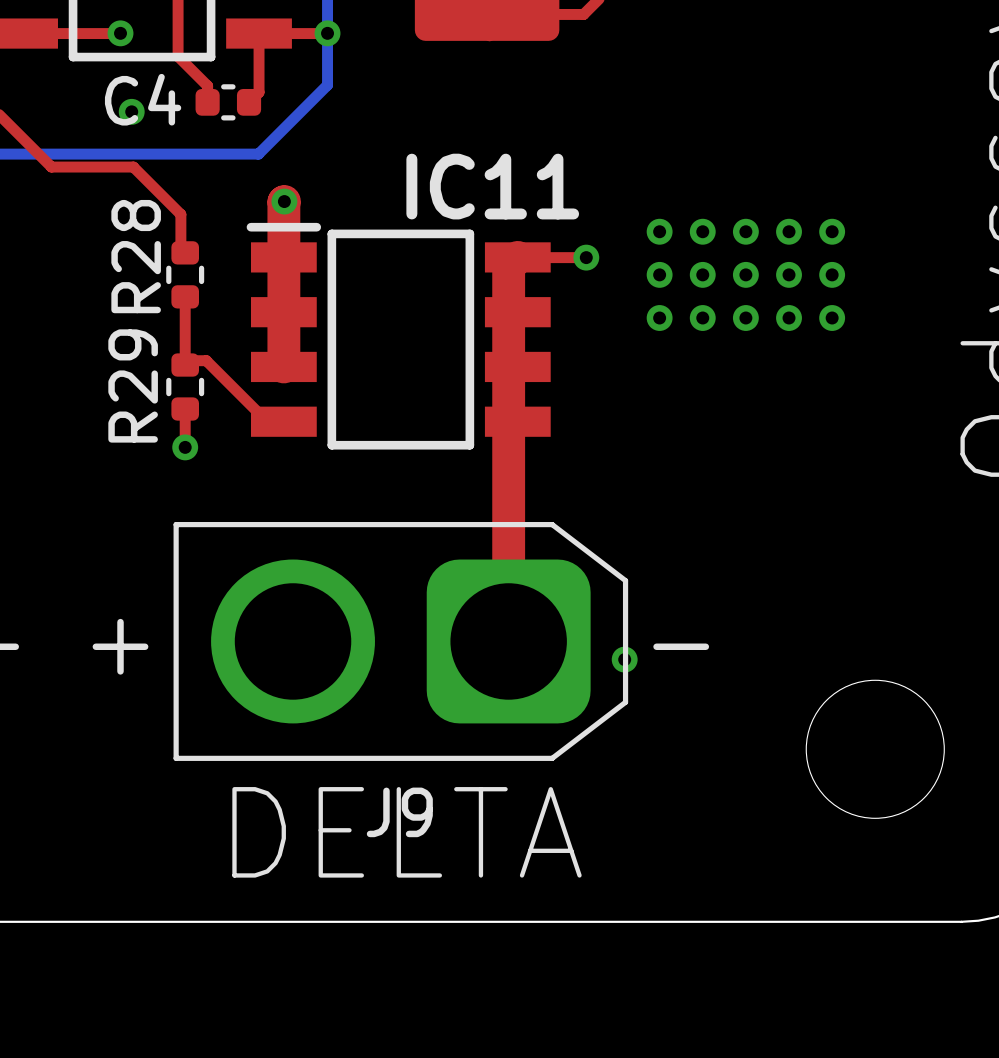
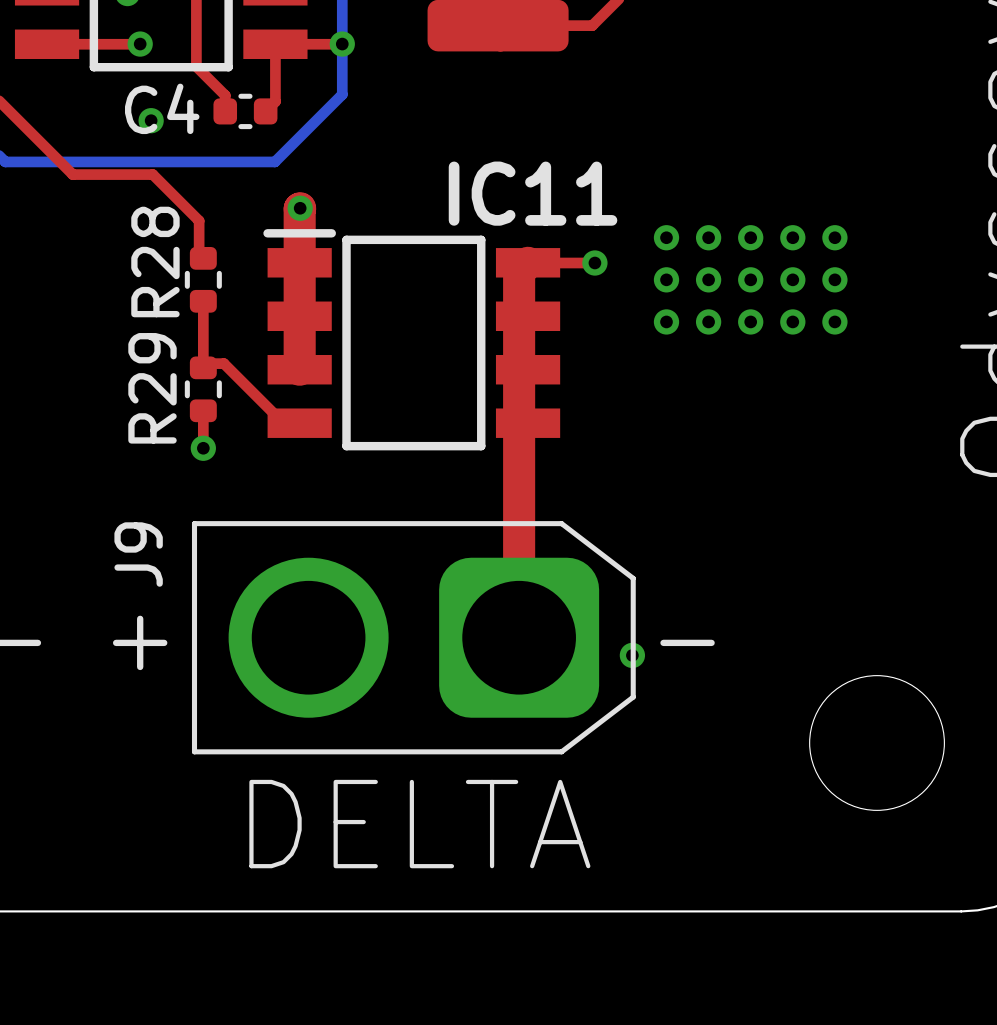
IC11 name position: IC11 (492, 186) -> IC11 (533, 193)
J9 name rotation: 0° (399, 812) -> 90° counterclockwise (138, 554)
J9 name position: J9 (399, 812) -> J9 (138, 554)

